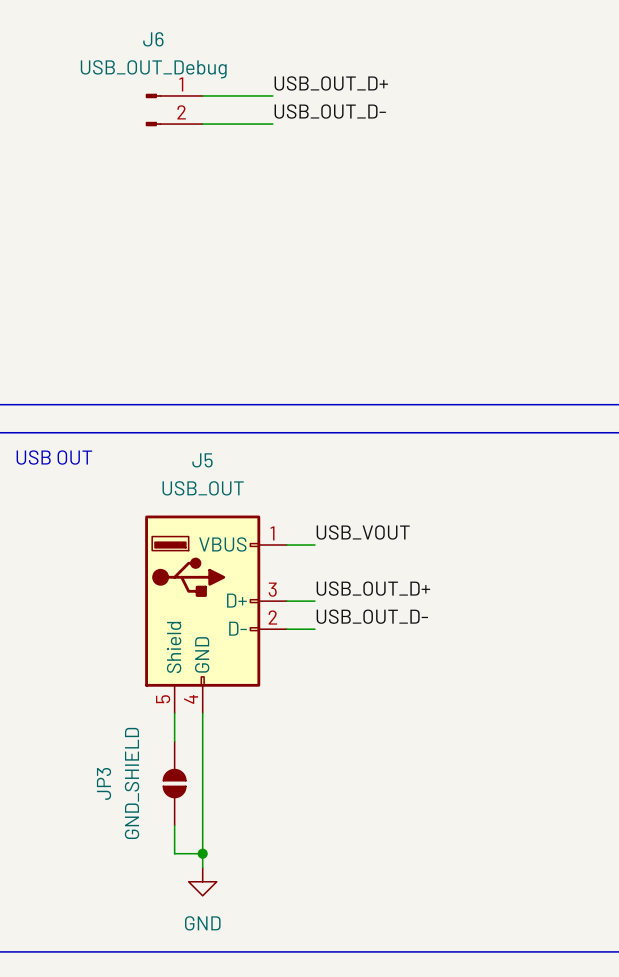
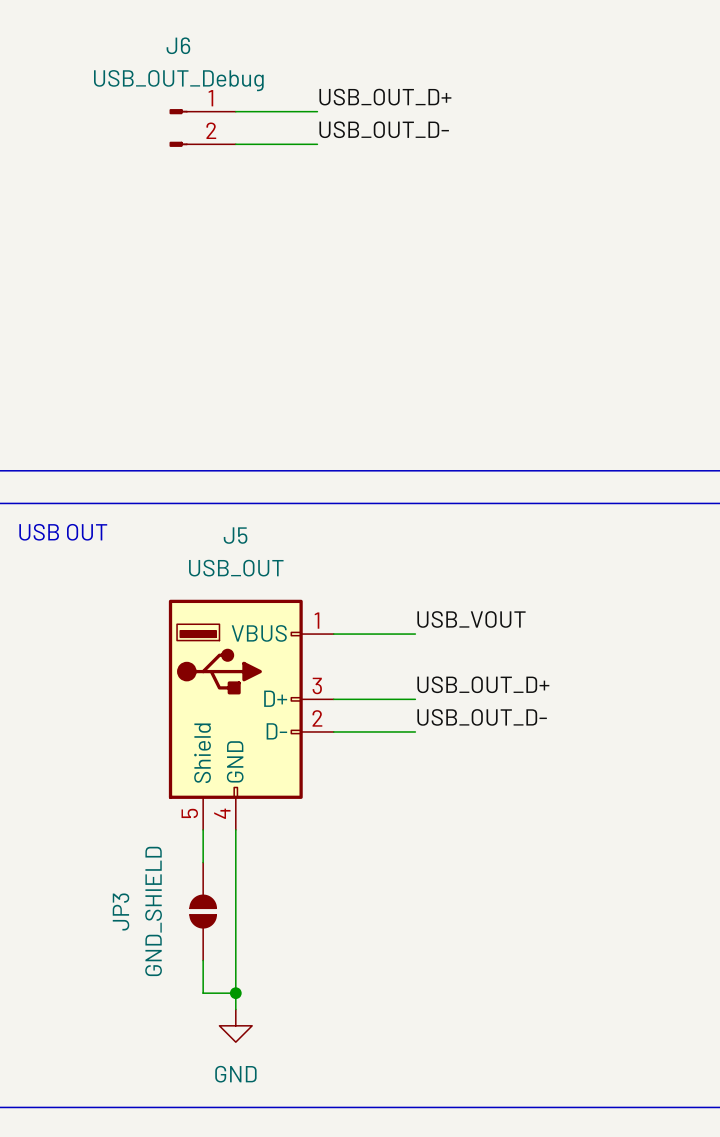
label position: USB_VOUT (363, 532) -> USB_VOUT (471, 619)
wire: none -> (366, 634) (415, 634)
label position: USB_OUT_D+ (373, 588) -> USB_OUT_D+ (483, 684)
wire: none -> (366, 699) (415, 699)
label position: USB_OUT_D- (372, 616) -> USB_OUT_D- (482, 717)
wire: none -> (366, 731) (415, 731)

